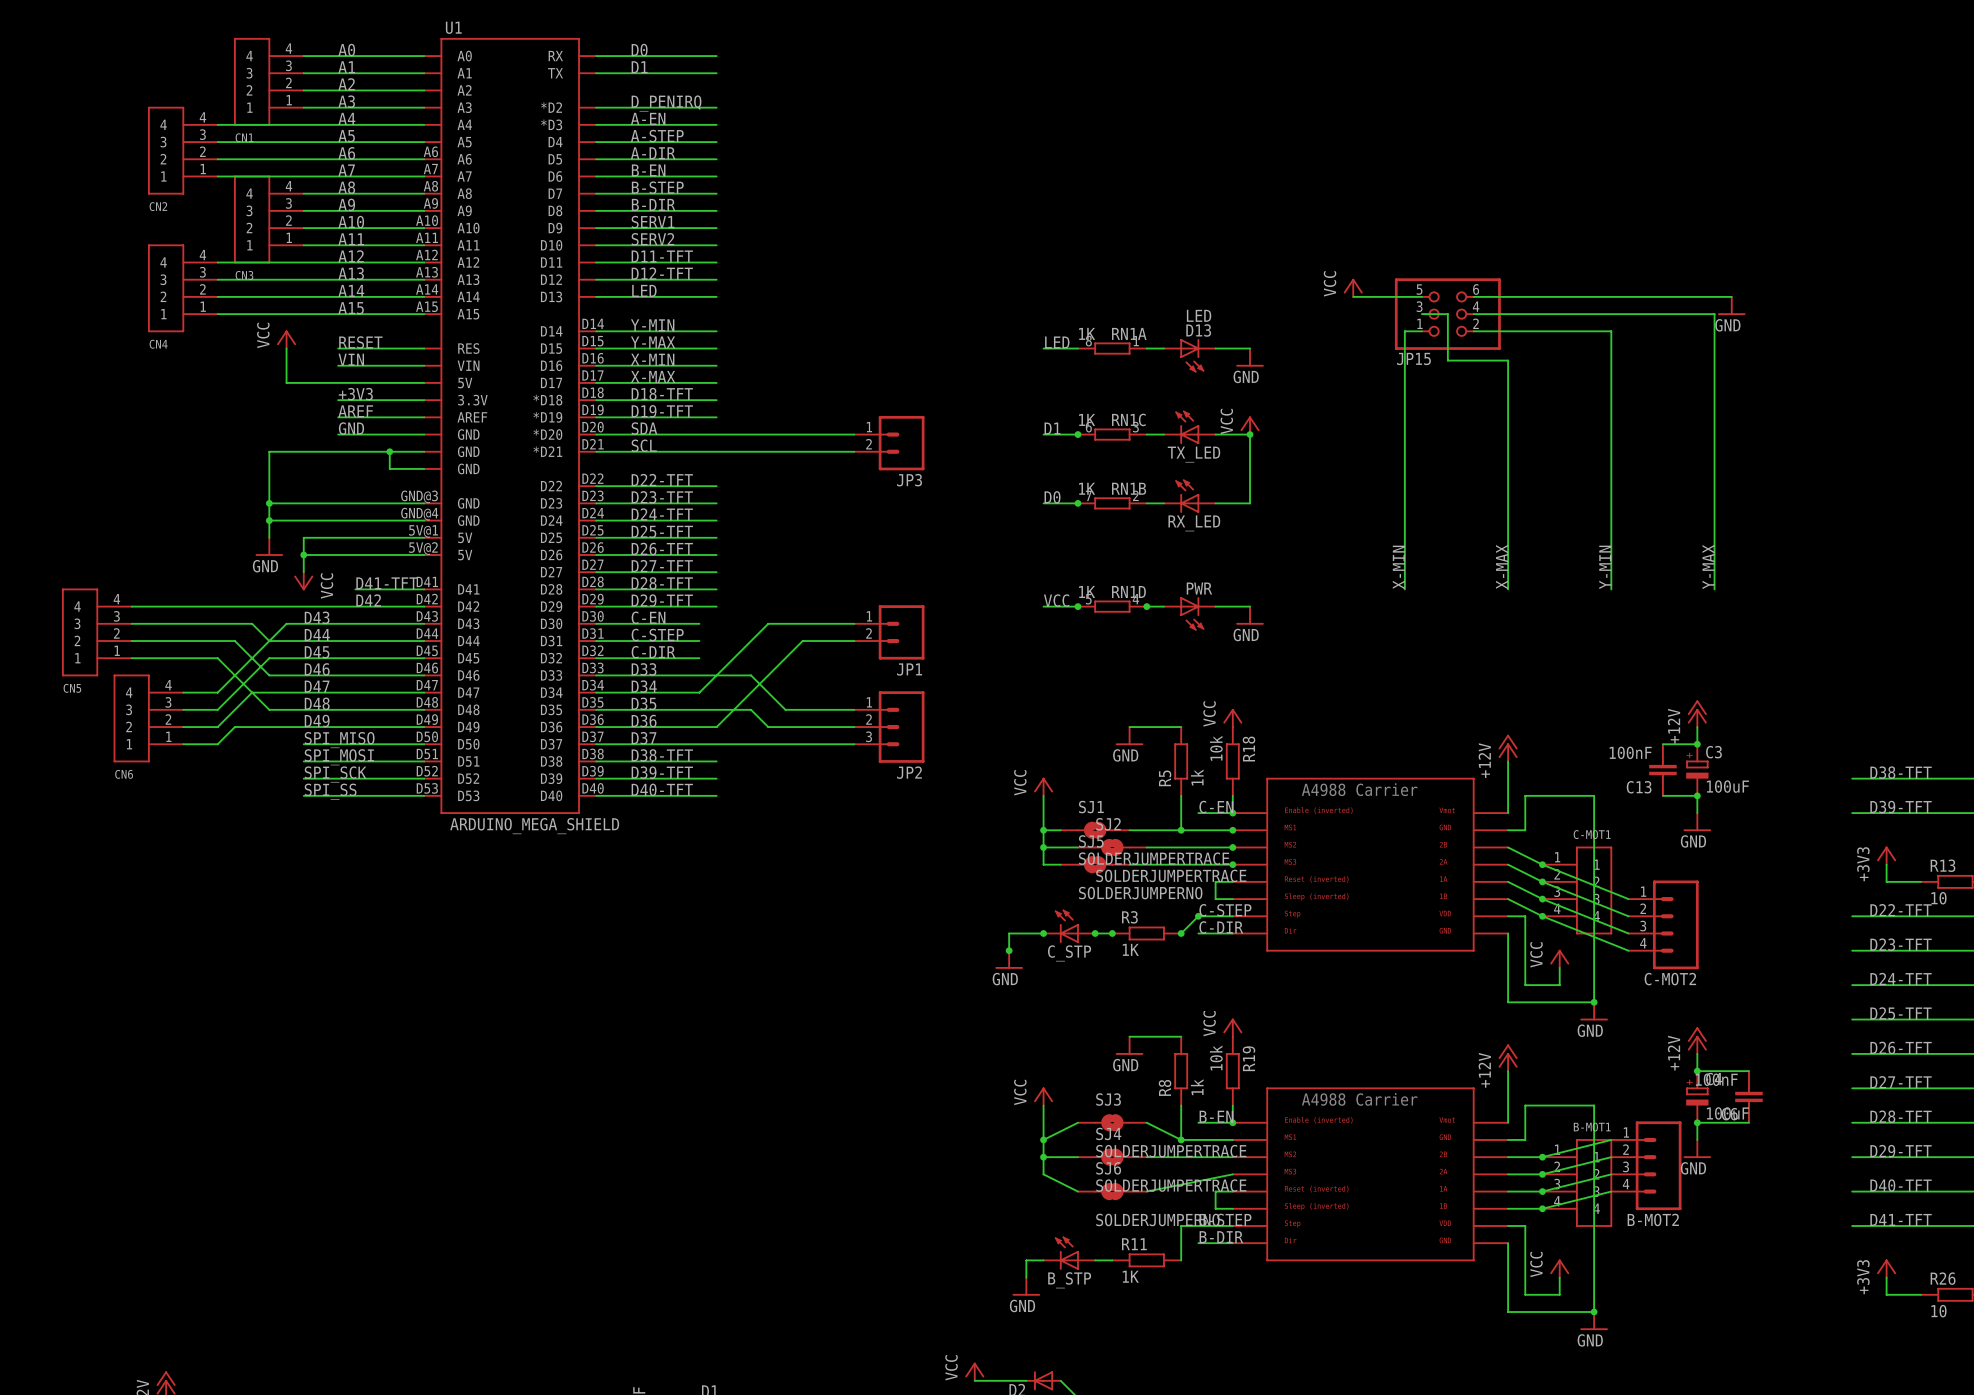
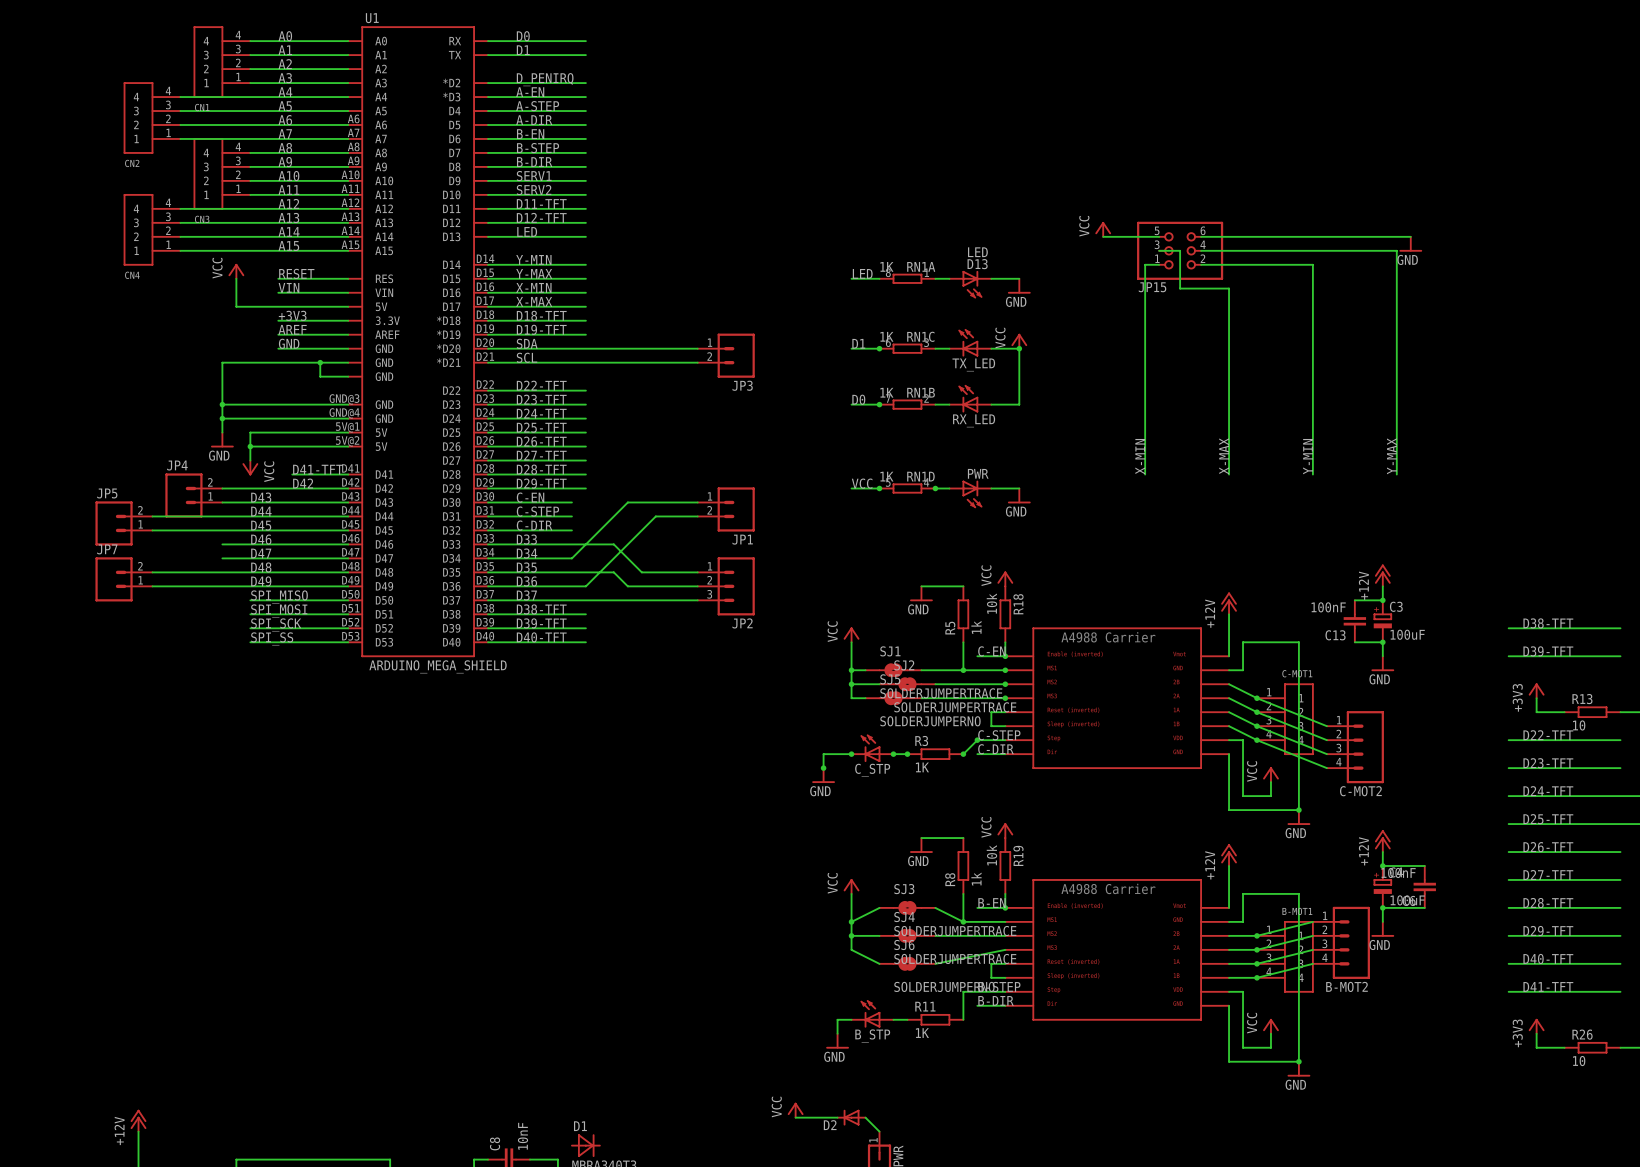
wire: (131, 606) (269, 606) -> none
JP4: none -> (193, 495)
wire: (131, 623) (252, 623) (269, 641) -> none
wire: (286, 623) (217, 692) (183, 692) -> (236, 502) (222, 502)
CN5: (96, 632) -> none
wire: (234, 641) (269, 675) -> (194, 516) (222, 516)
JP5: none -> (123, 523)
wire: (217, 658) (269, 709) -> (180, 530) (222, 530)
wire: (269, 658) (217, 709) -> (222, 572) (180, 572)
wire: (269, 692) (252, 692) (217, 727) -> none
CN6: (148, 718) -> none
JP7: none -> (123, 579)
wire: (234, 727) (217, 744) (183, 744) -> (194, 586) (180, 586)

